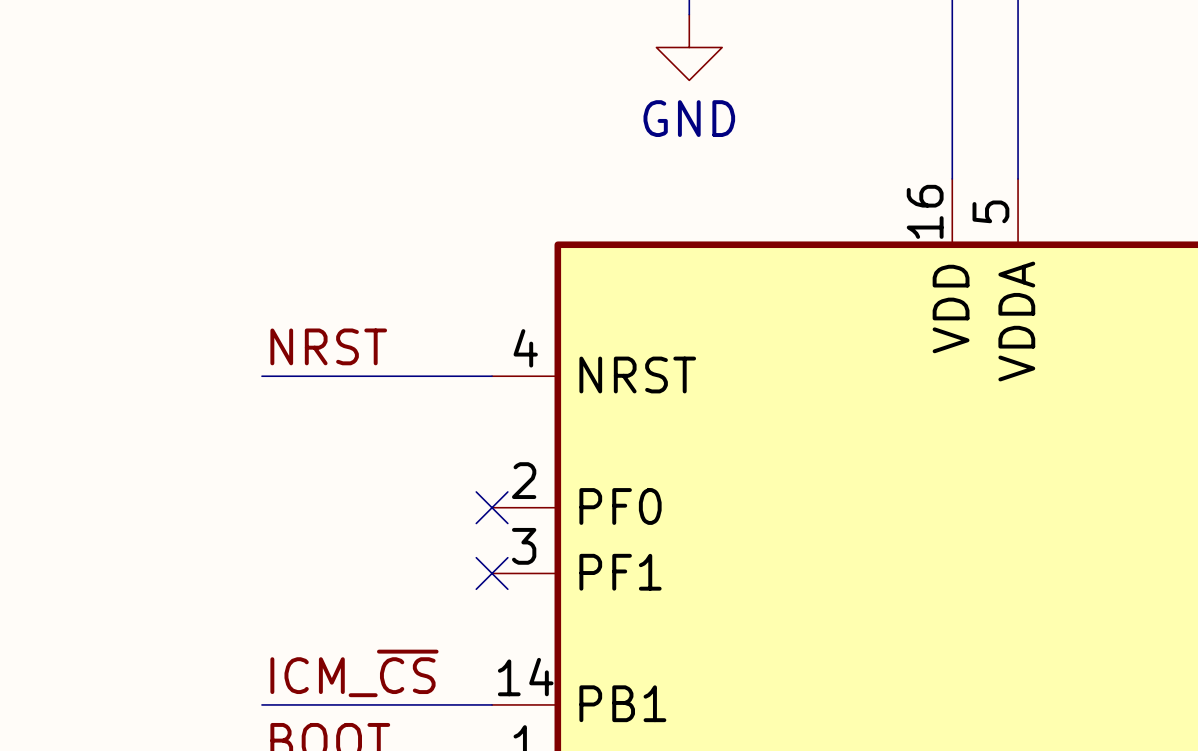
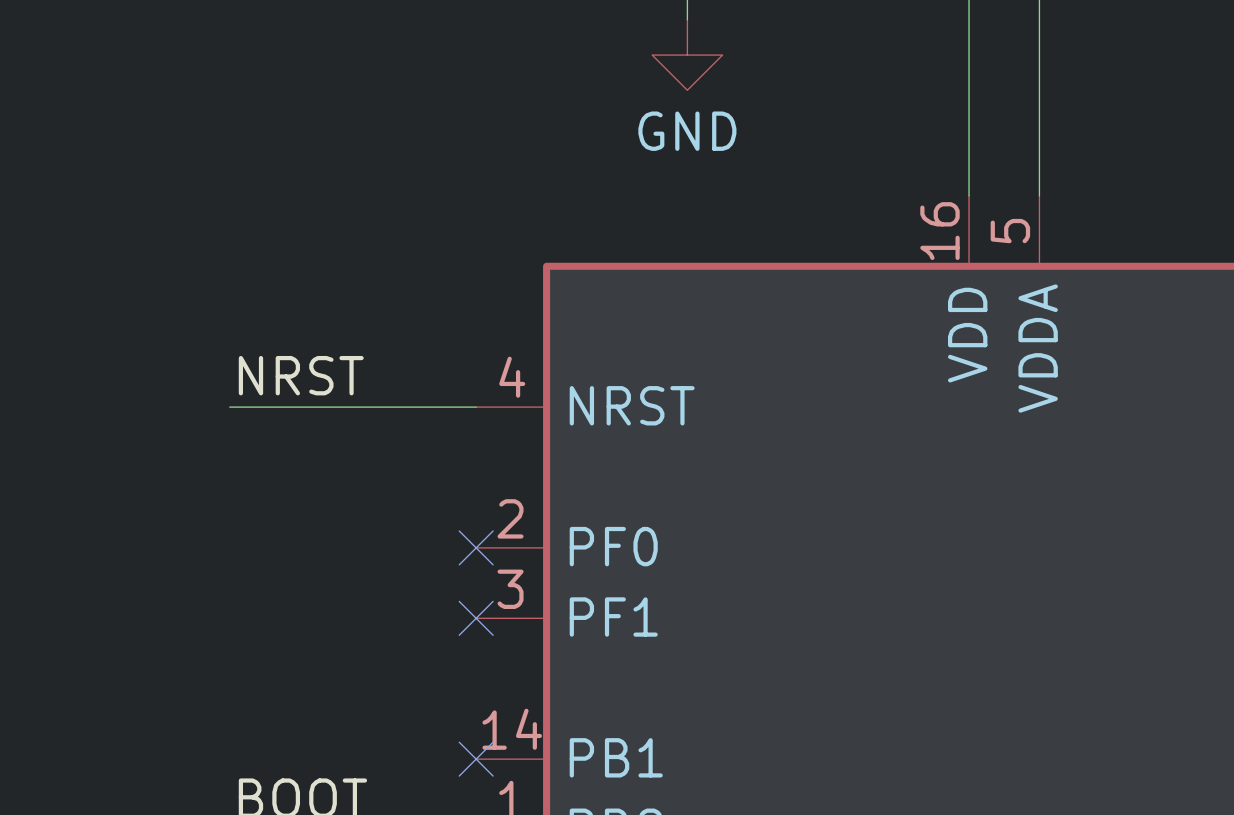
label: ICM_~{CS} (354, 673) -> none
wire: (261, 704) (492, 704) -> none
no-connect mark: none -> (476, 759)

